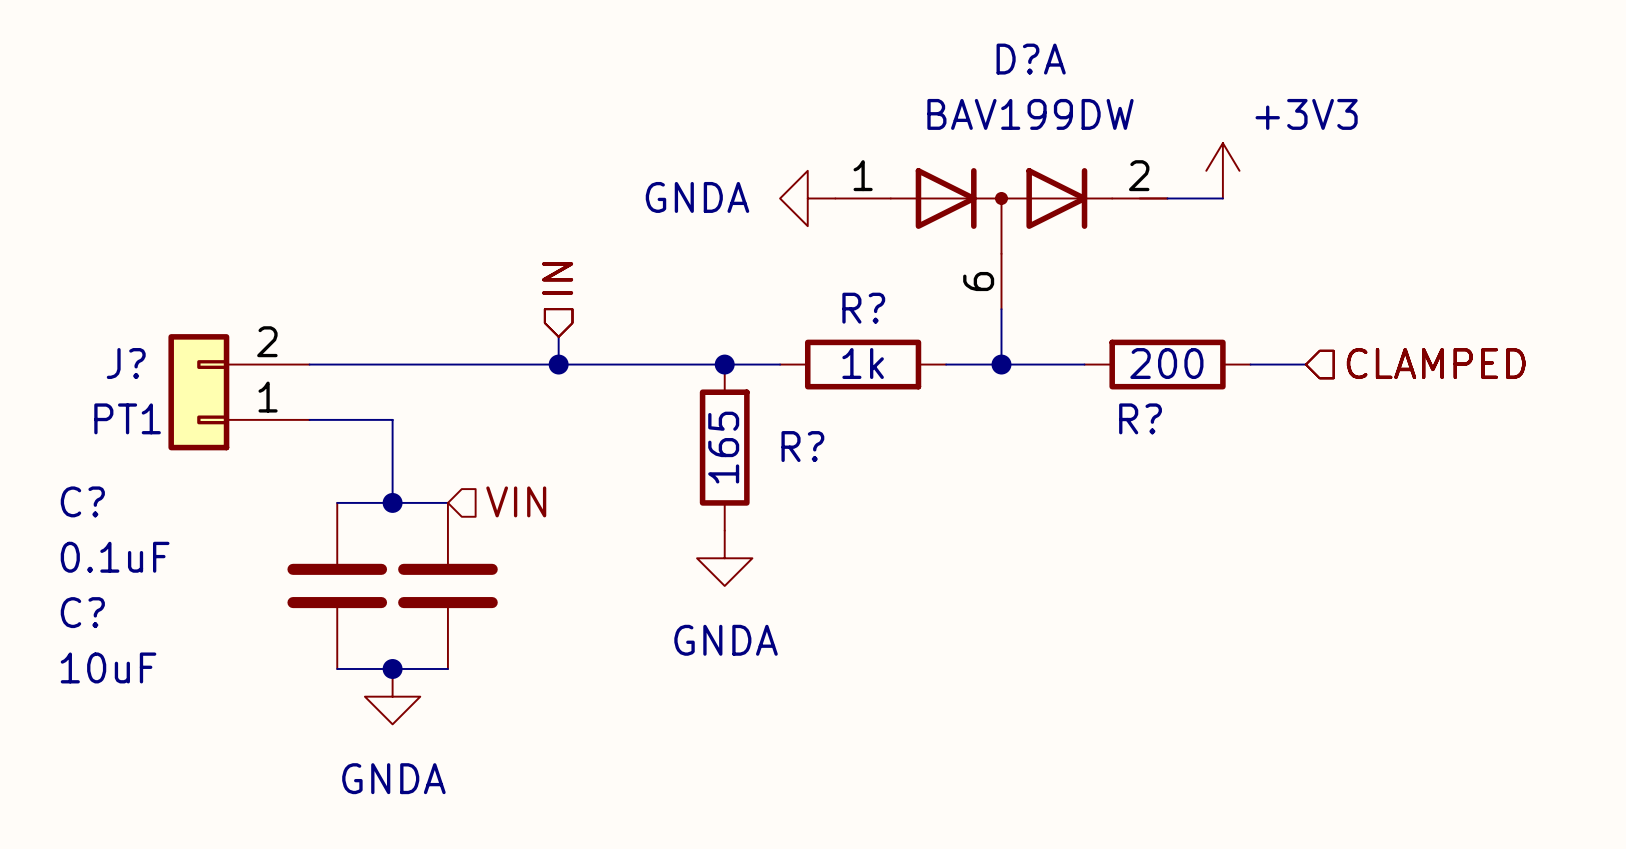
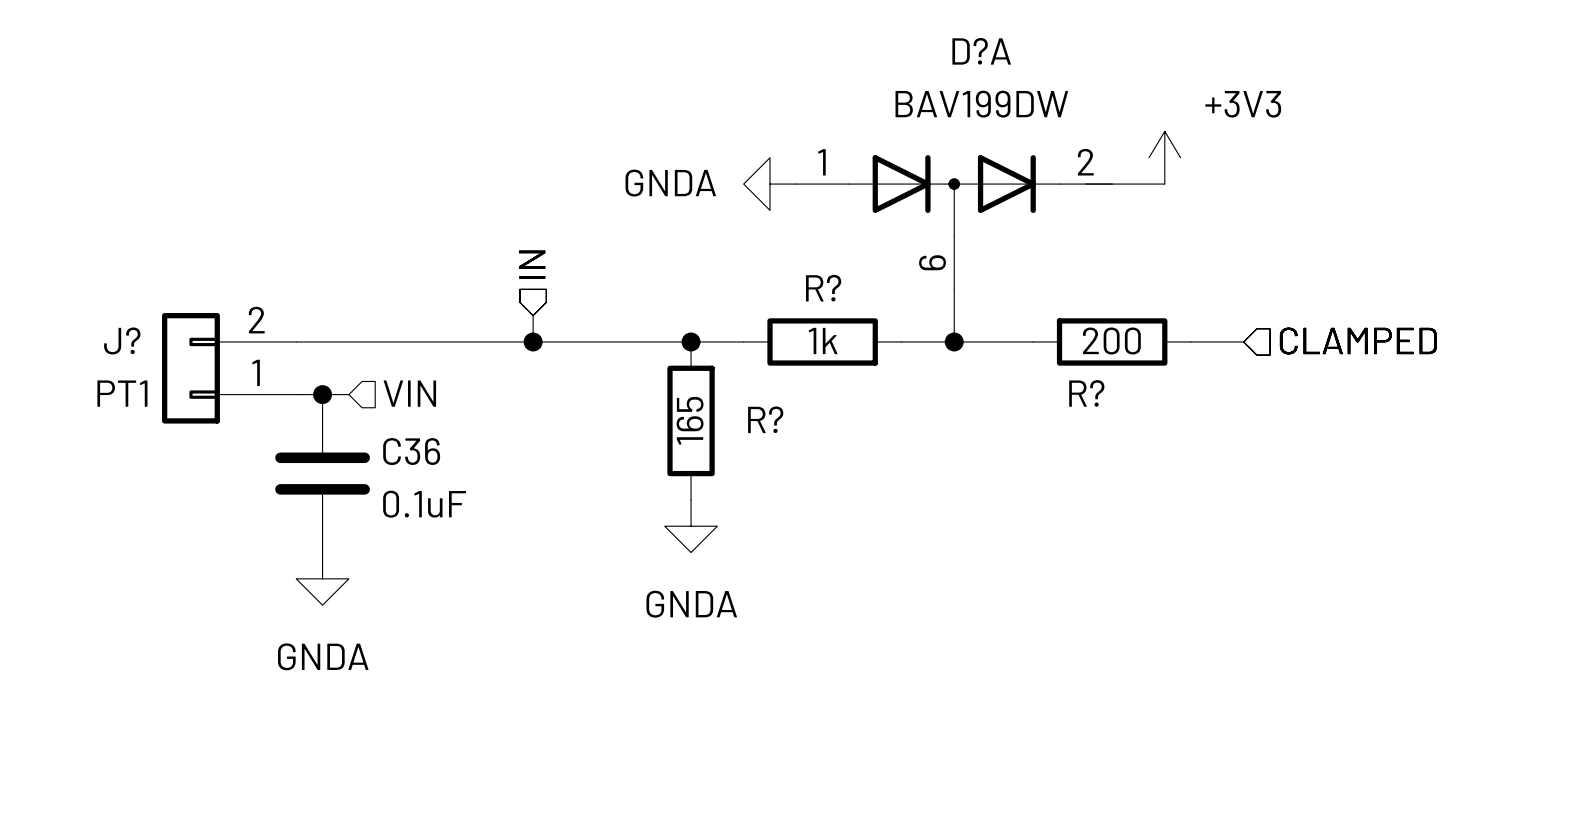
wire: (364, 419) (392, 419) (392, 502) -> none
hierarchical label position: VIN (516, 501) -> VIN (409, 393)
wire: (337, 502) (447, 502) -> none
C36: none -> 0.1uF (322, 473)
junction position: (392, 502) -> (322, 394)
C?: 0.1uF (337, 585) -> none
C?: 10uF (447, 585) -> none
wire: (337, 668) (447, 668) -> none
junction: (392, 668) -> none
power symbol position: GNDA (392, 696) -> GNDA (322, 578)

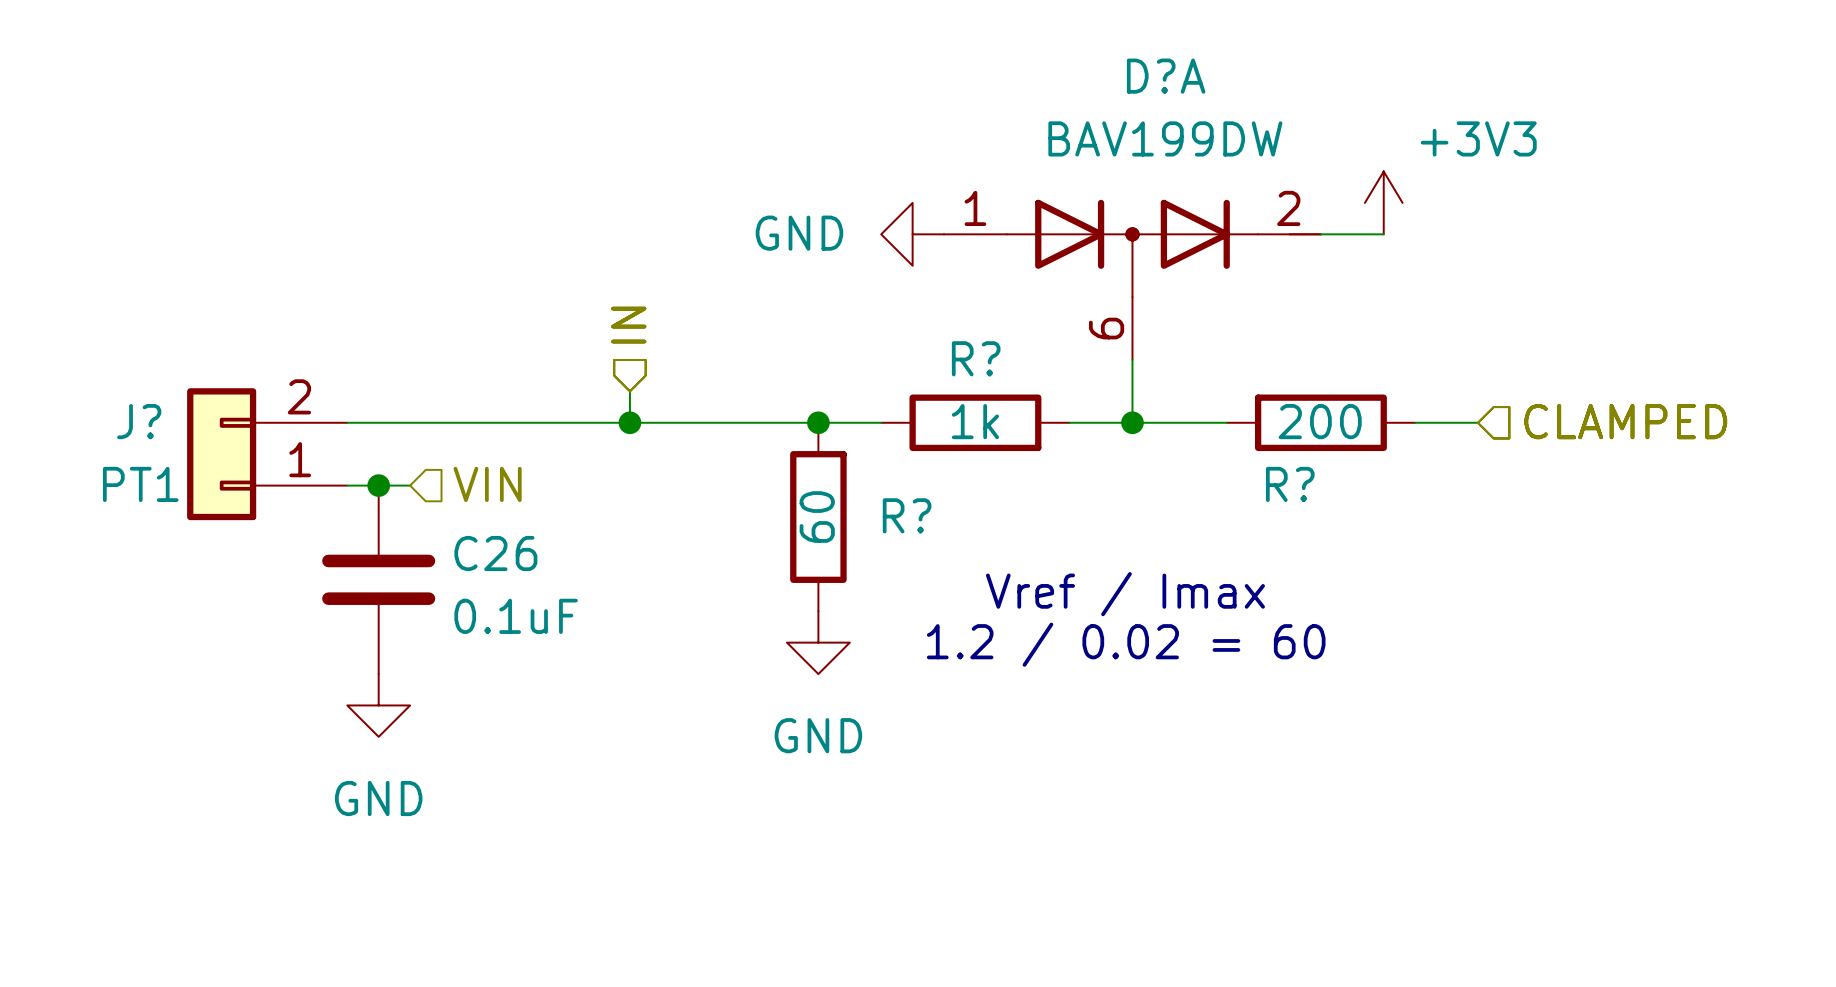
power symbol: GNDA (770, 184) -> GND (912, 234)
R? value: 165 (690, 420) -> 60 (817, 517)
C36 name: C36 (411, 451) -> C26 (495, 553)
text: none -> Vref / Imax (1125, 594)
text: none -> 1.2 / 0.02 = 60 (1126, 644)
power symbol: GNDA (691, 526) -> GND (818, 642)
power symbol: GNDA (322, 578) -> GND (378, 705)

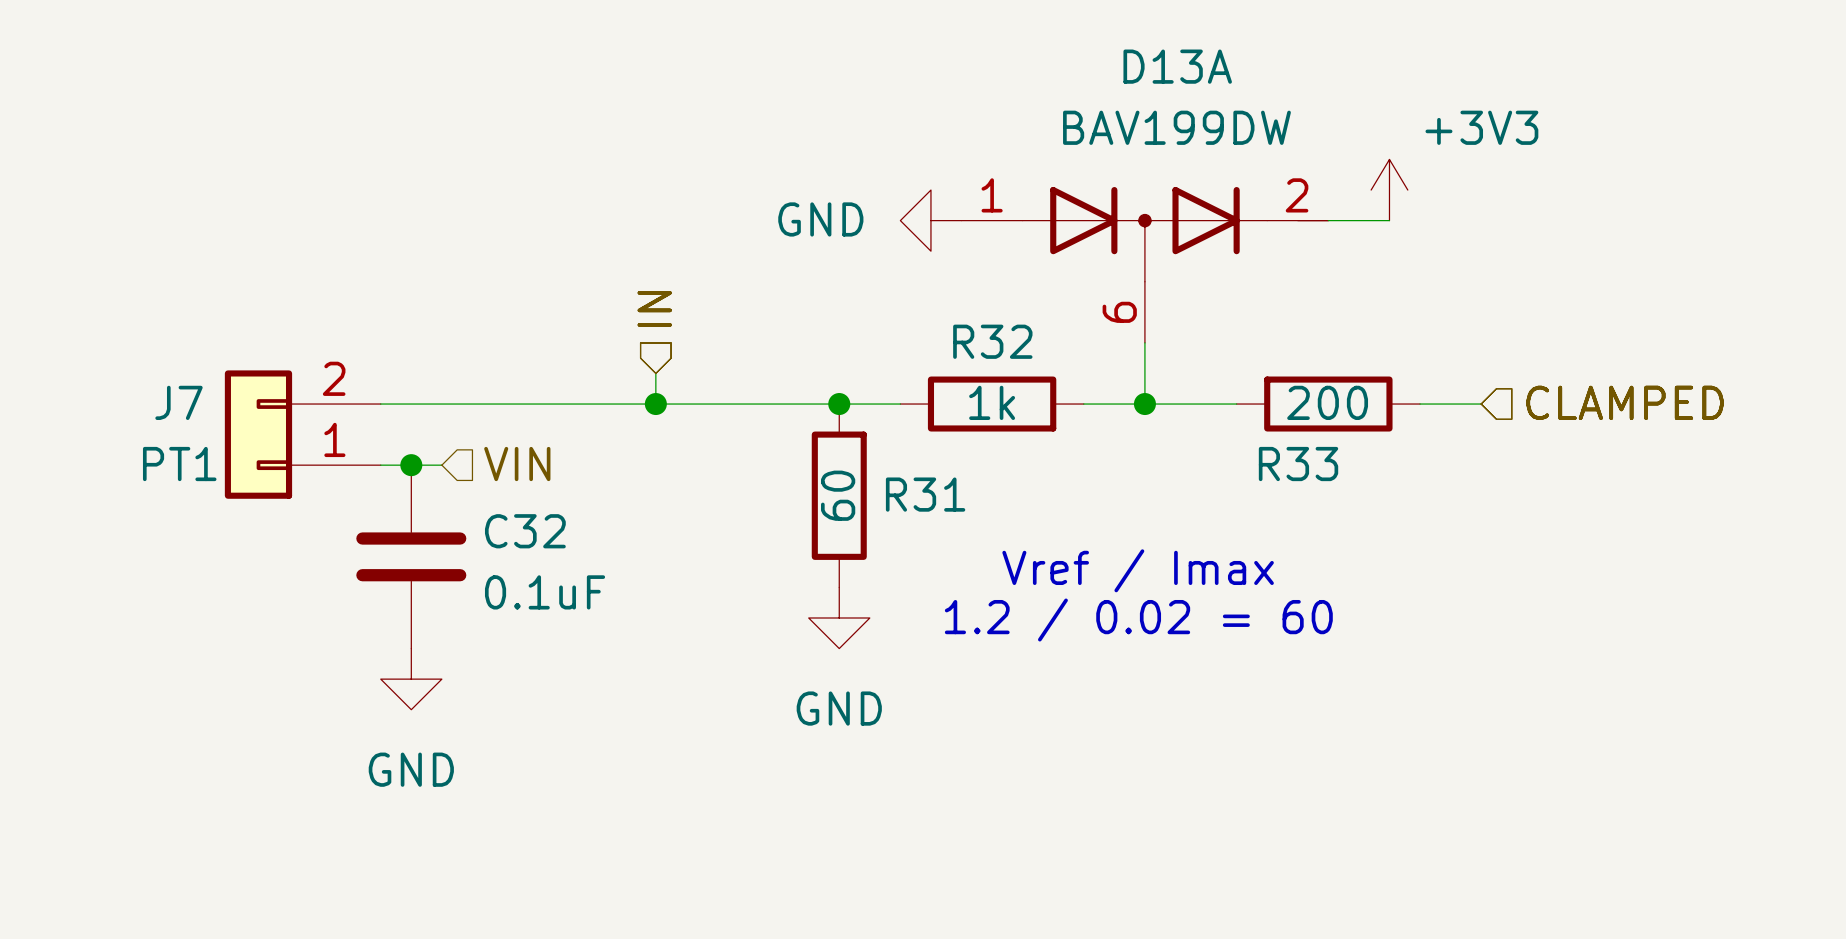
D?A name: D?A (1166, 76) -> D13A (1177, 66)
R? name: R? (976, 358) -> R32 (992, 341)
J? name: J? (139, 421) -> J7 (179, 402)
R? name: R? (1290, 484) -> R33 (1298, 464)
R? name: R? (907, 515) -> R31 (925, 494)
C26 name: C26 (495, 553) -> C32 (525, 531)

